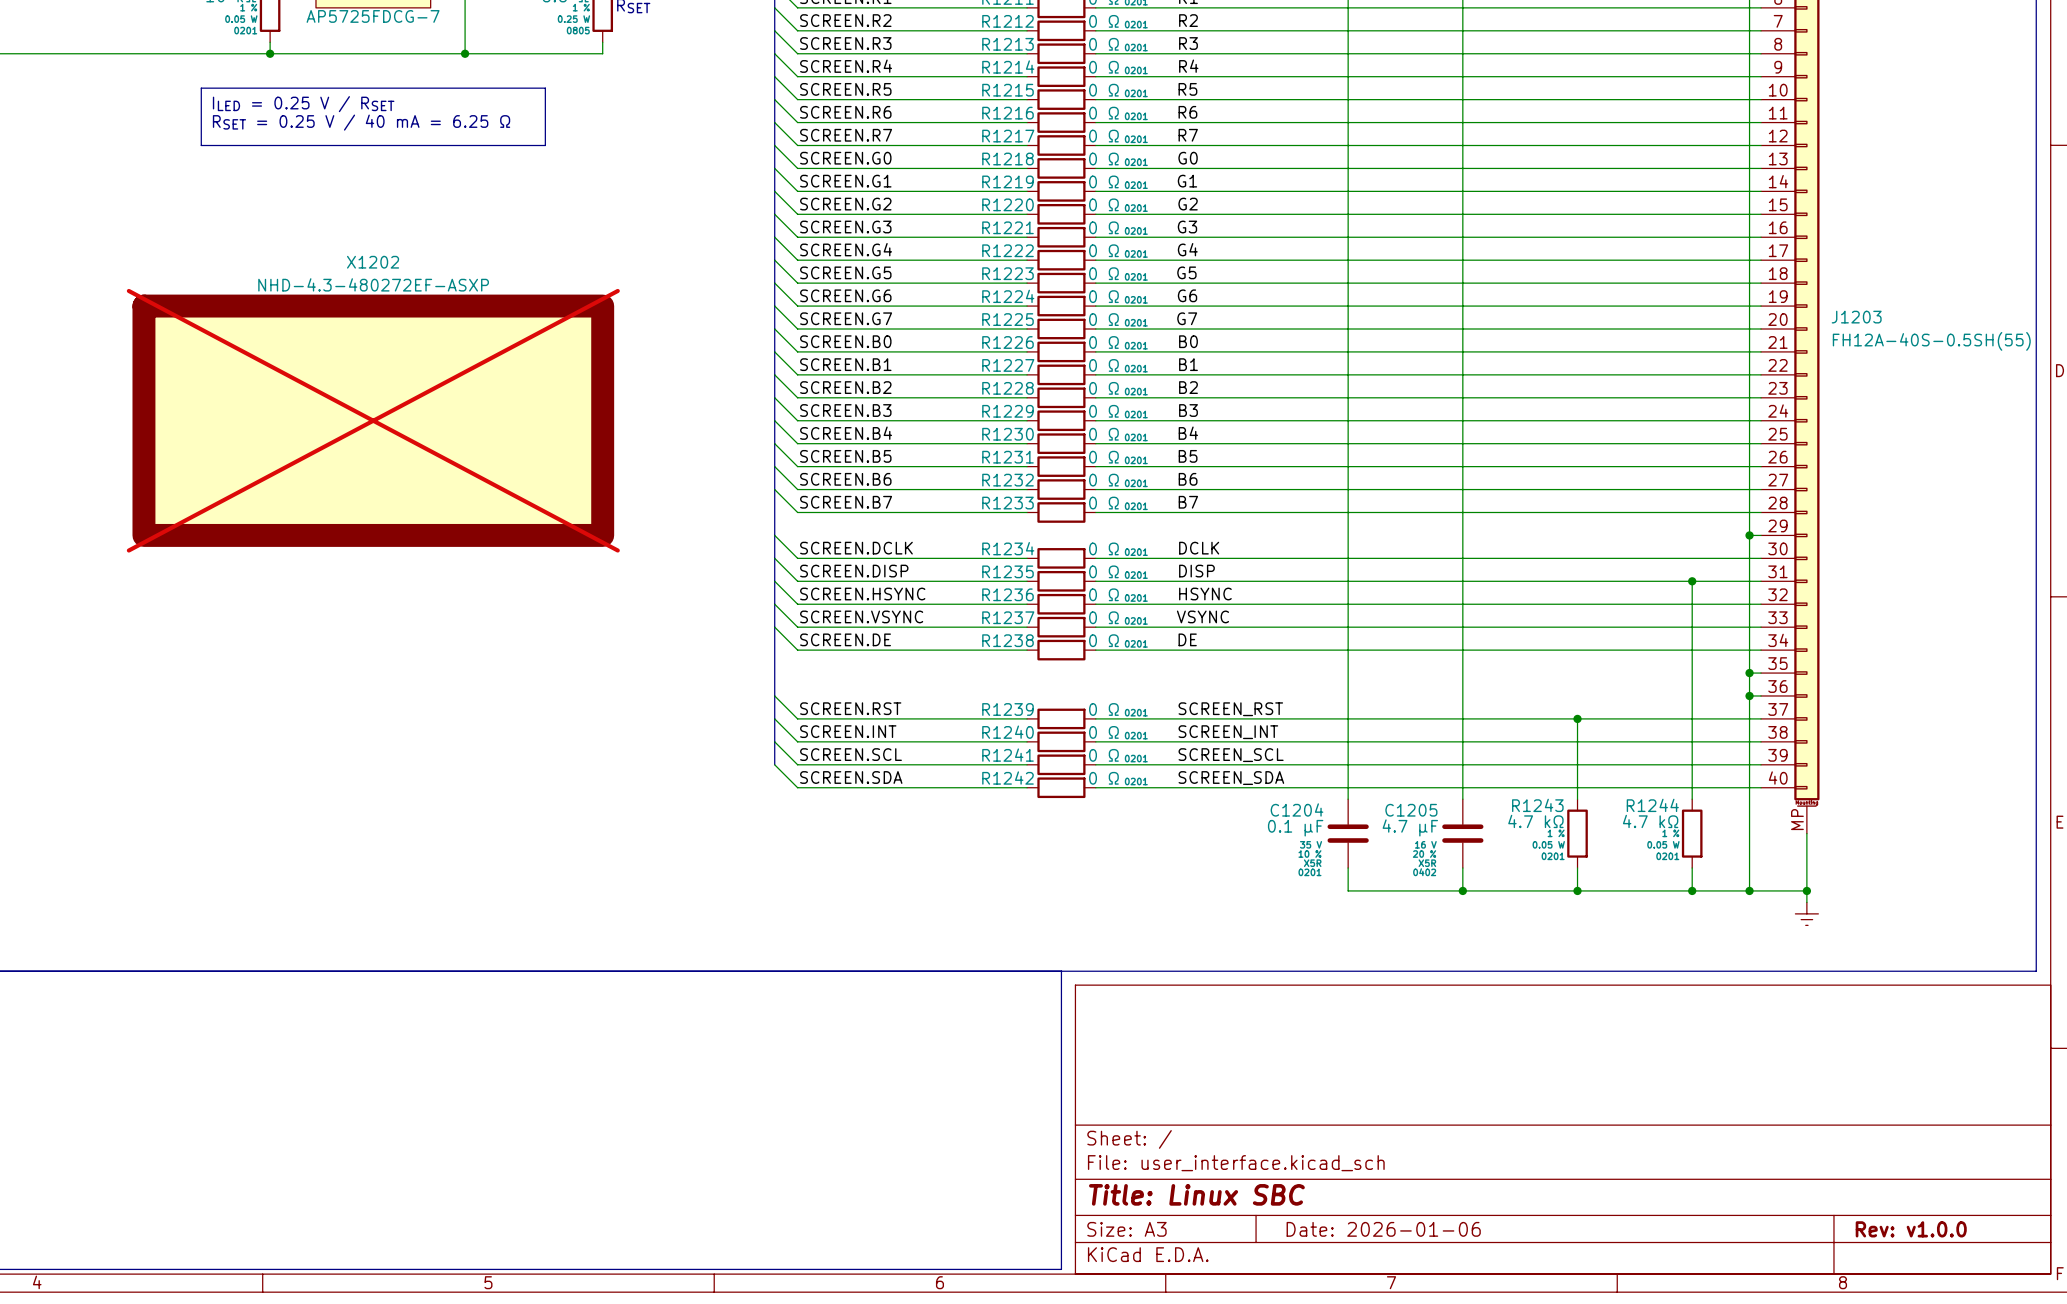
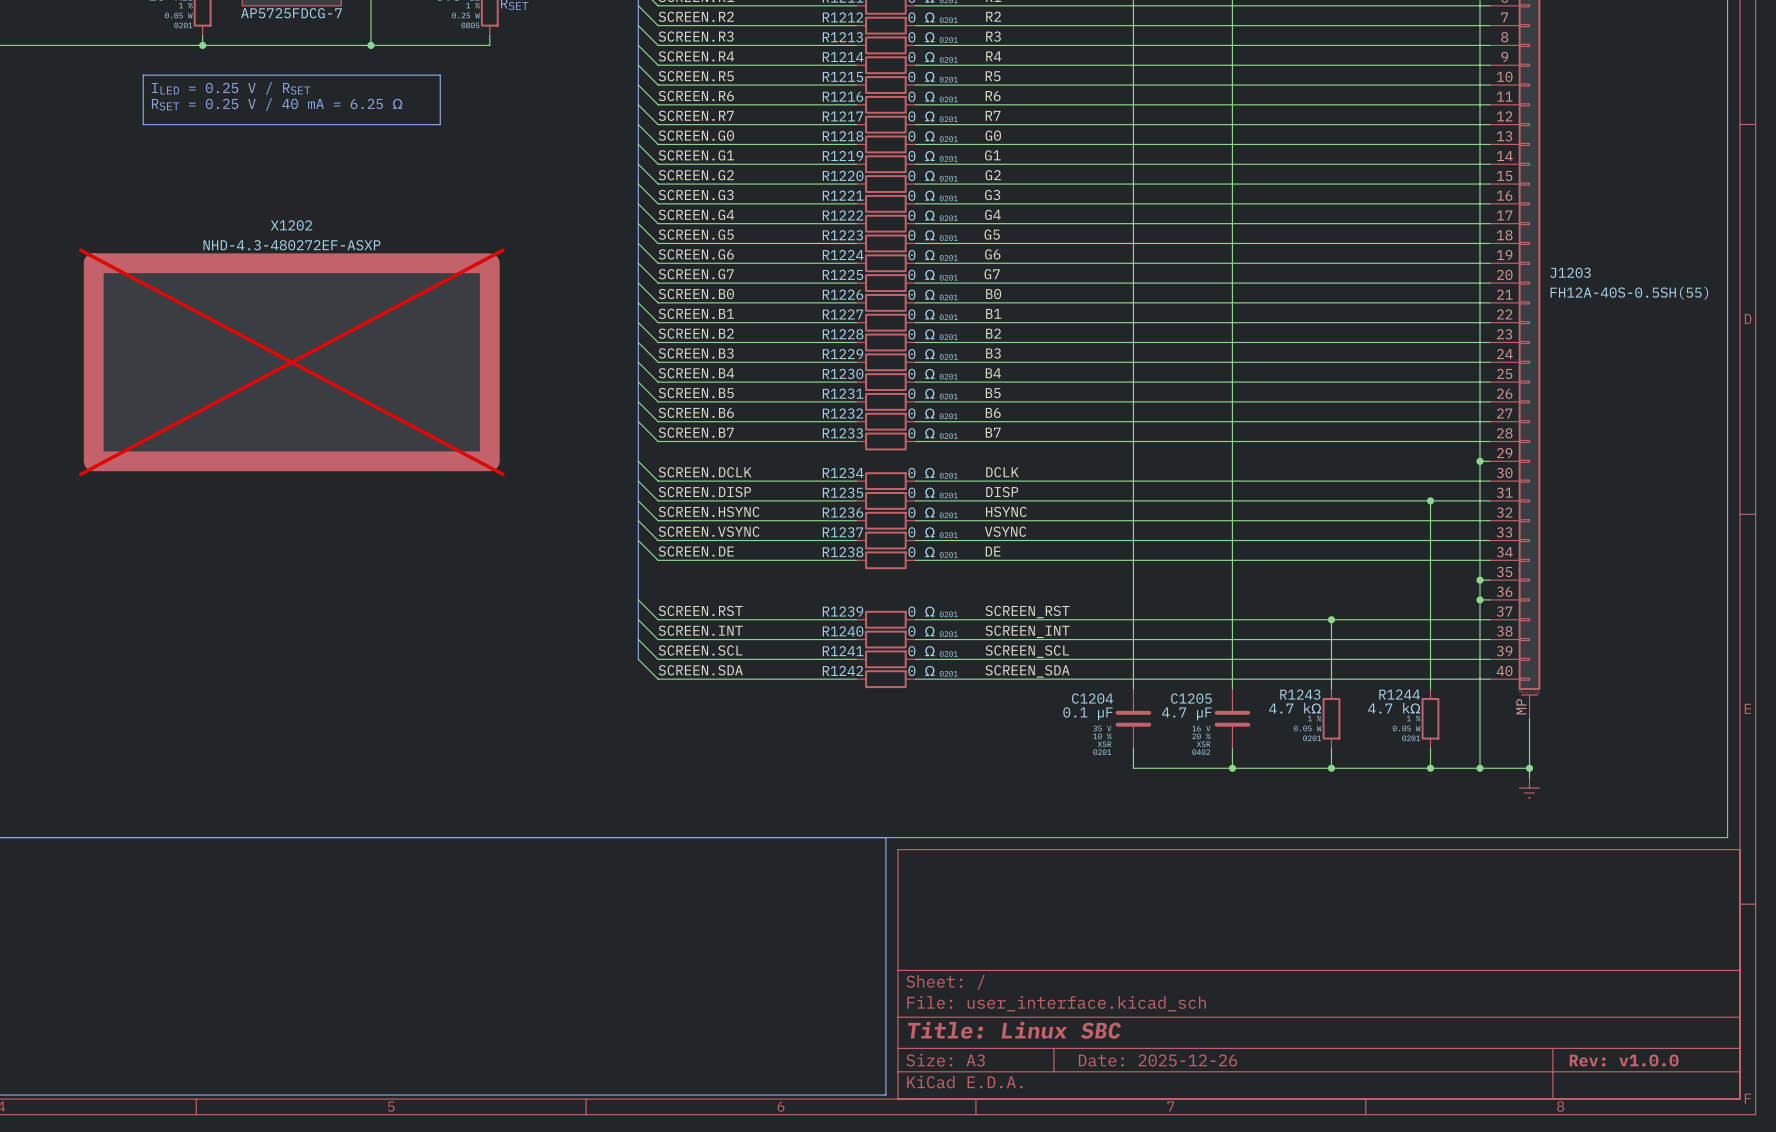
title block: Date: 2026-01-06 (1383, 1229) -> Date: 2025-12-26 (1157, 1060)

